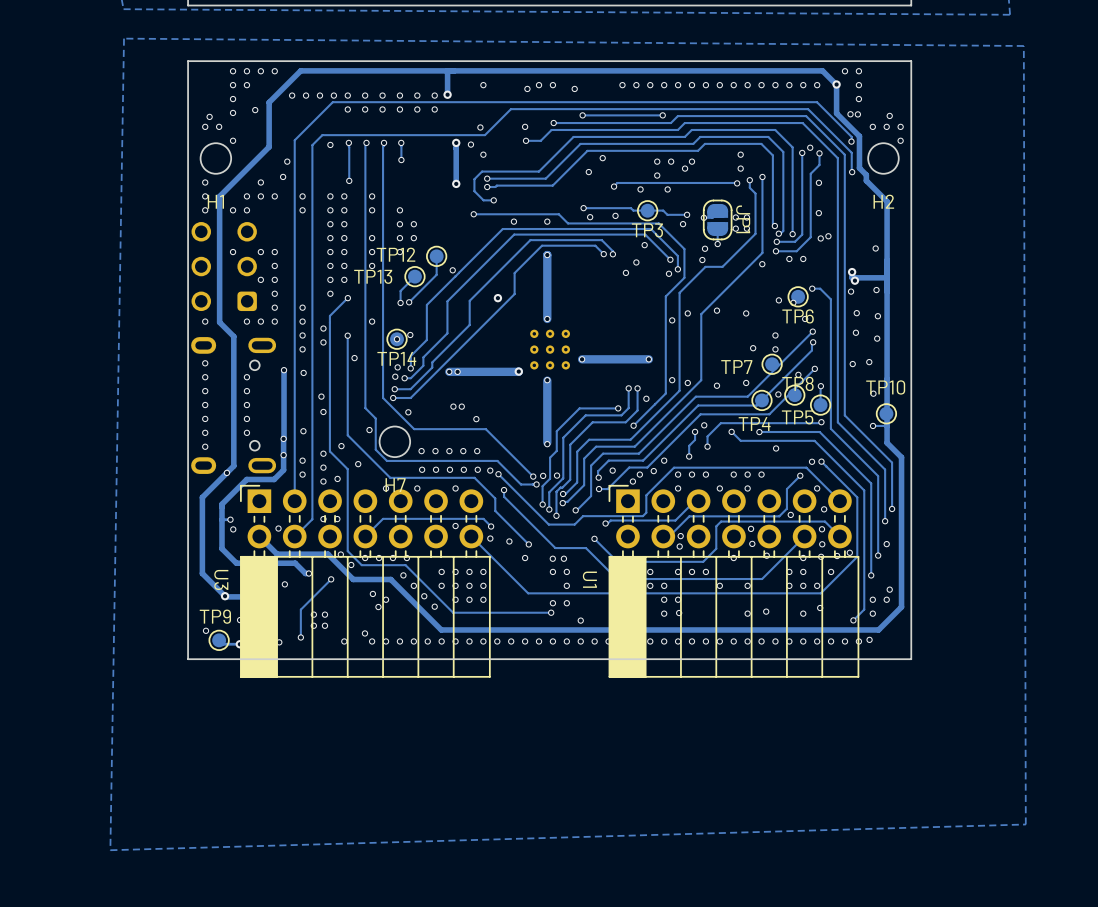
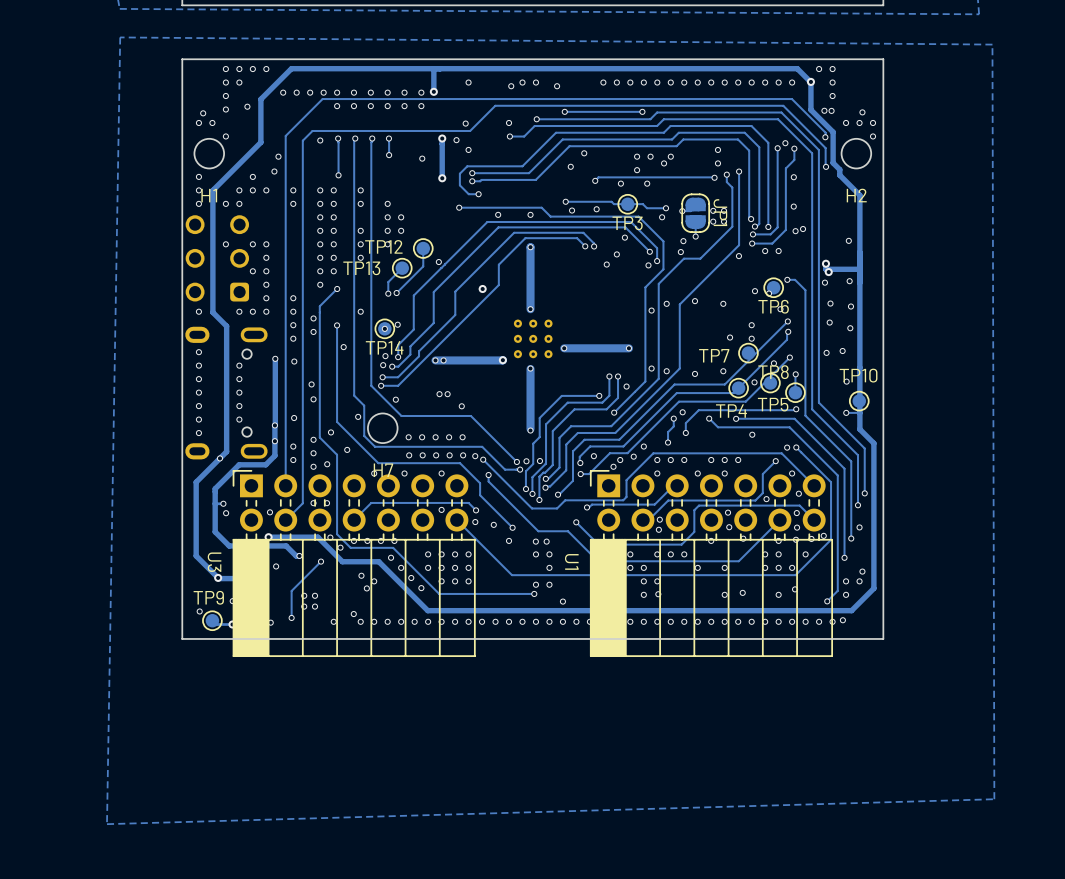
via: none -> (422, 158)
track: (259, 536) (277, 554) -> none
via: none -> (268, 537)

